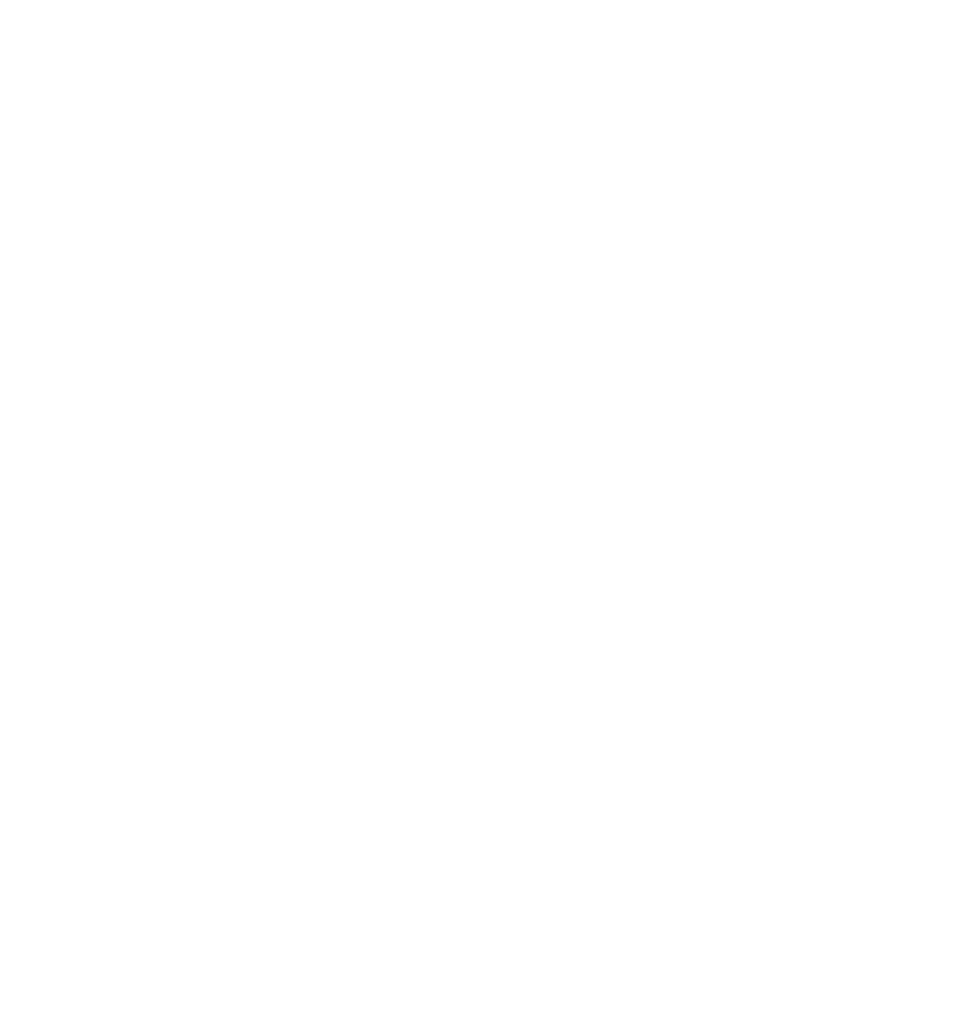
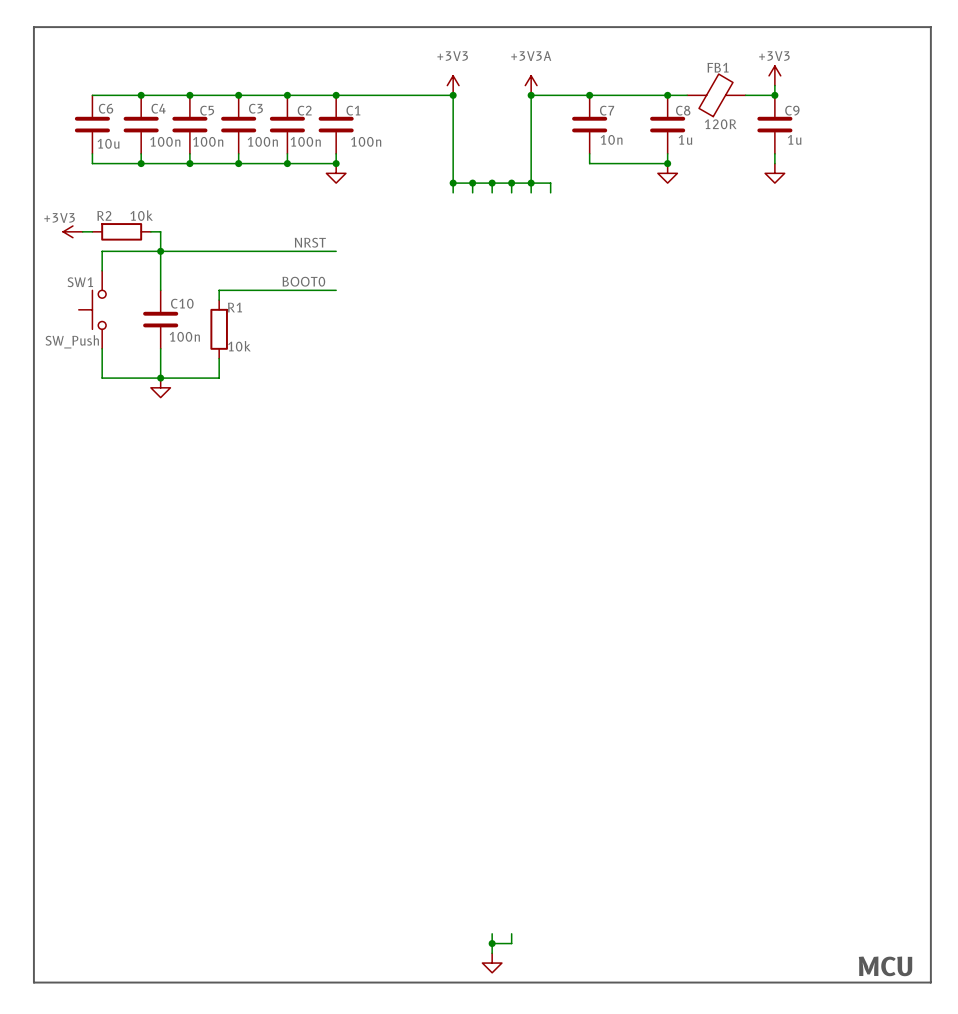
line: none -> (33, 27) (930, 27) (930, 982) (33, 982) (33, 27)
power symbol: none -> +3V3 (774, 75)
power symbol: none -> +3V3 (453, 85)
power symbol: none -> +3V3A (531, 85)
wire: none -> (774, 85) (774, 95) (745, 95)
wire: none -> (92, 95) (453, 95) (453, 192)
junction: none -> (141, 95)
junction: none -> (189, 95)
junction: none -> (238, 95)
junction: none -> (287, 95)
junction: none -> (336, 95)
junction: none -> (453, 95)
junction: none -> (531, 95)
junction: none -> (589, 95)
junction: none -> (667, 95)
wire: none -> (687, 95) (531, 95) (531, 192)
FB1: none -> 120R (716, 95)
junction: none -> (774, 95)
C6: none -> 10u (92, 124)
C4: none -> 100n (141, 124)
C5: none -> 100n (189, 124)
C3: none -> 100n (238, 124)
C2: none -> 100n (287, 124)
C1: none -> 100n (336, 124)
C7: none -> 10n (589, 124)
C8: none -> 1u (667, 124)
C9: none -> 1u (774, 124)
wire: none -> (92, 153) (92, 163) (336, 163) (336, 153)
wire: none -> (141, 153) (141, 163)
wire: none -> (189, 153) (189, 163)
wire: none -> (238, 153) (238, 163)
wire: none -> (287, 153) (287, 163)
wire: none -> (589, 153) (589, 163) (667, 163) (667, 153)
wire: none -> (774, 153) (774, 163)
junction: none -> (141, 163)
junction: none -> (189, 163)
junction: none -> (238, 163)
junction: none -> (287, 163)
junction: none -> (336, 163)
junction: none -> (667, 163)
power symbol: none -> (336, 173)
power symbol: none -> (667, 173)
power symbol: none -> (774, 173)
wire: none -> (453, 183) (550, 183) (550, 192)
junction: none -> (453, 183)
wire: none -> (472, 183) (472, 192)
junction: none -> (472, 183)
wire: none -> (492, 183) (492, 192)
junction: none -> (492, 183)
wire: none -> (511, 183) (511, 192)
junction: none -> (511, 183)
junction: none -> (531, 183)
power symbol: none -> +3V3 (72, 231)
wire: none -> (82, 231) (92, 231)
R2: none -> 10k (121, 231)
wire: none -> (150, 231) (160, 231) (160, 290)
label: none -> NRST (310, 242)
junction: none -> (160, 251)
wire: none -> (336, 251) (102, 251) (102, 270)
label: none -> BOOT0 (303, 281)
wire: none -> (336, 290) (219, 290) (219, 300)
SW1: none -> SW_Push (92, 309)
C10: none -> 100n (160, 319)
R1: none -> 10k (219, 329)
wire: none -> (102, 348) (102, 378) (219, 378) (219, 358)
wire: none -> (160, 348) (160, 378)
junction: none -> (160, 378)
power symbol: none -> (160, 387)
wire: none -> (492, 933) (492, 953)
wire: none -> (511, 933) (511, 943) (492, 943)
junction: none -> (492, 943)
power symbol: none -> (492, 963)
text: none -> MCU (885, 966)

